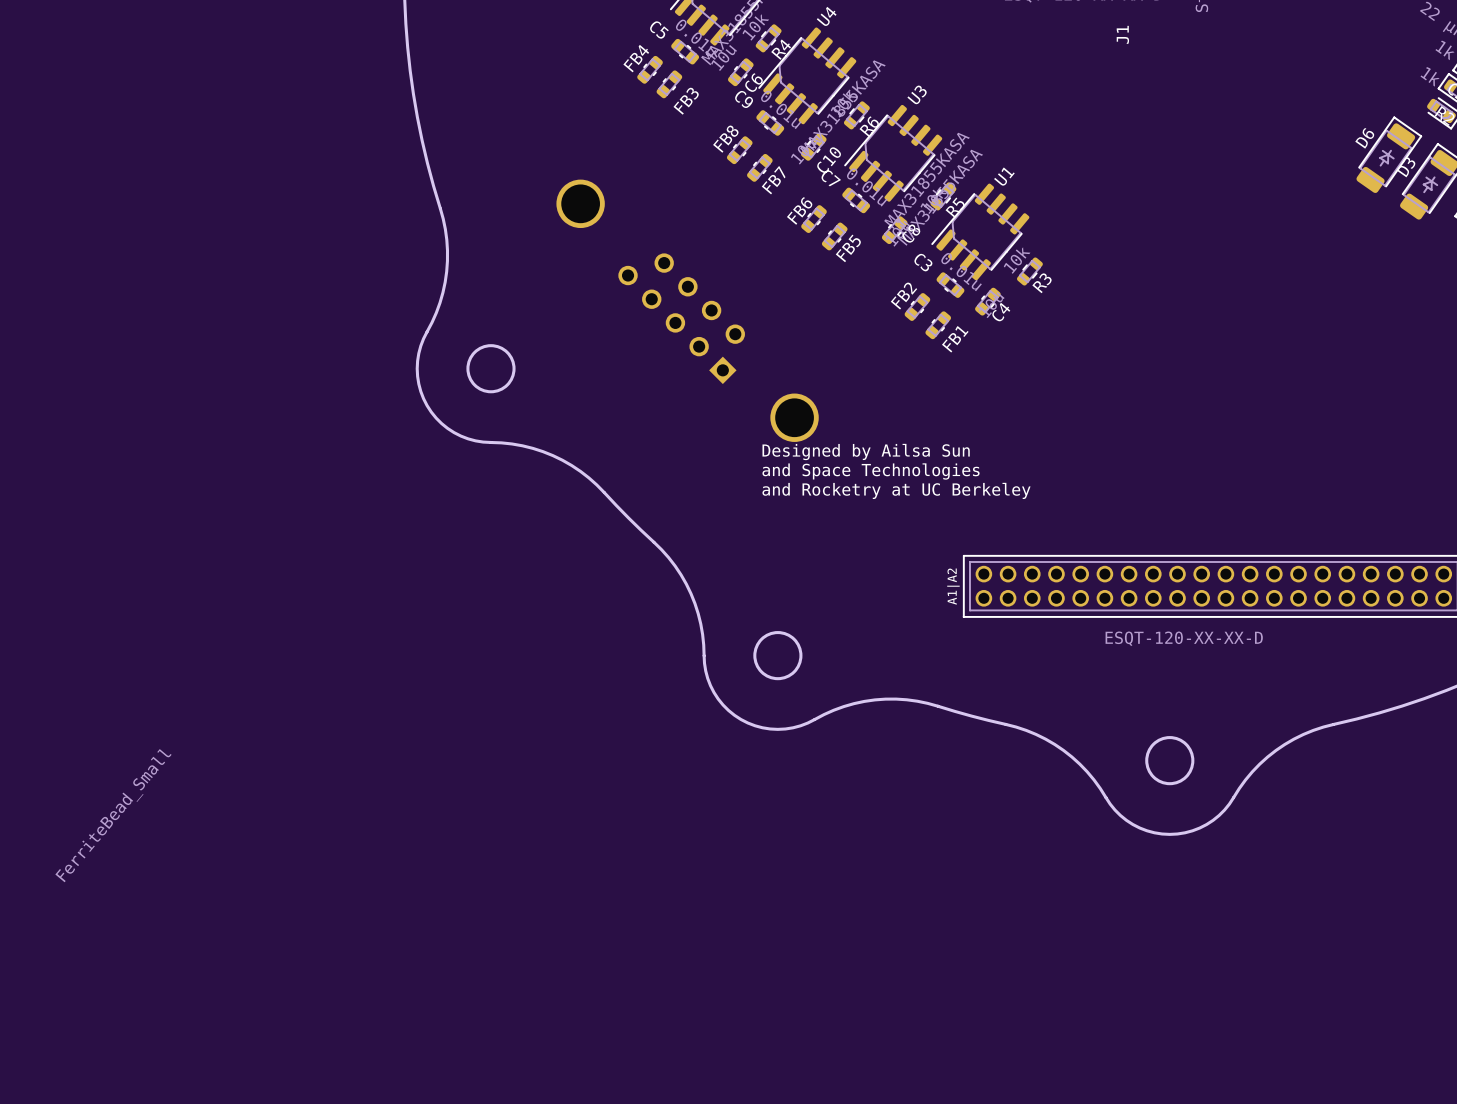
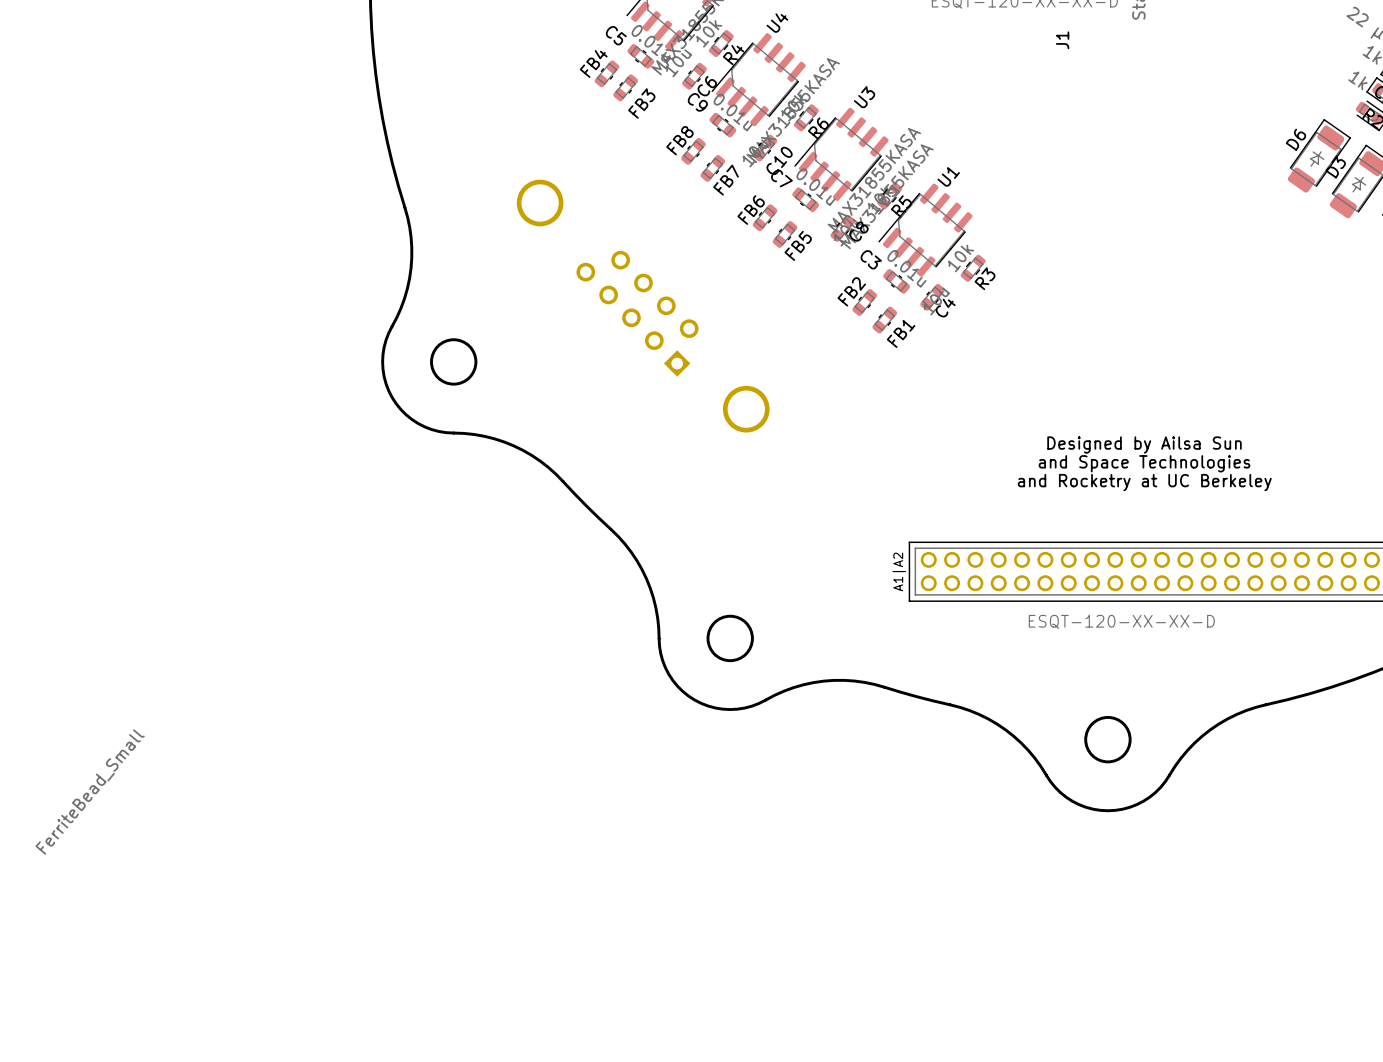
text: Designed by Ailsa Sun (866, 452) -> none
text: none -> Designed by Ailsa Sun (1144, 445)
text: and Space Technologies (871, 471) -> none
text: none -> and Space Technologies (1144, 463)
text: and Rocketry at UC Berkeley (896, 490) -> none
text: none -> and Rocketry at UC Berkeley (1144, 482)

